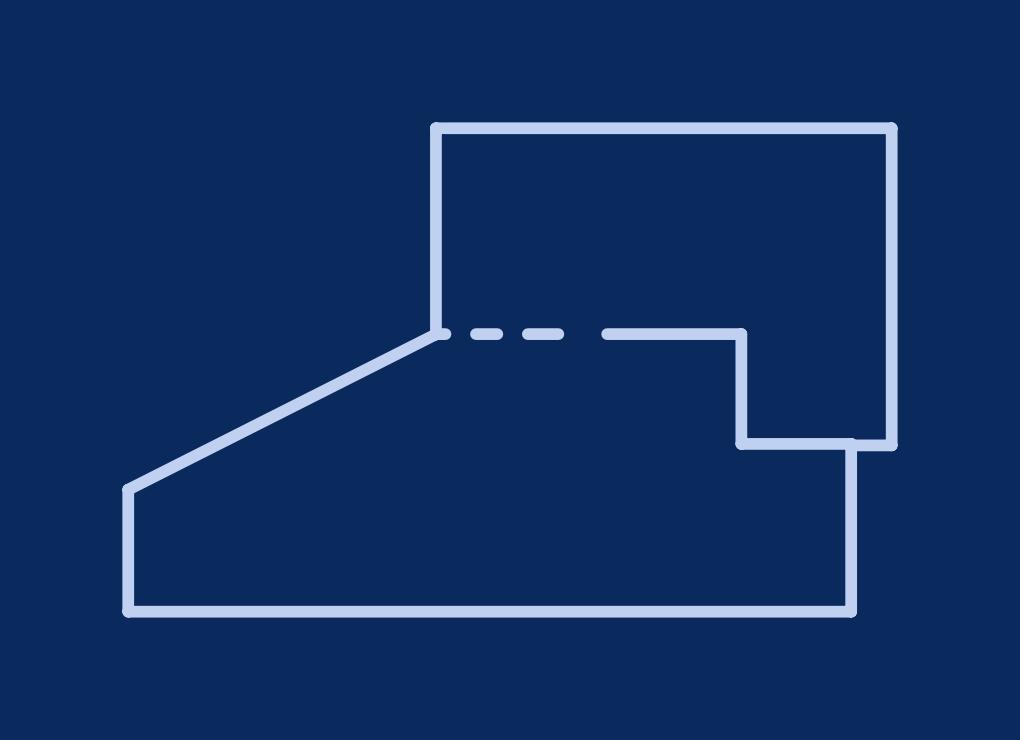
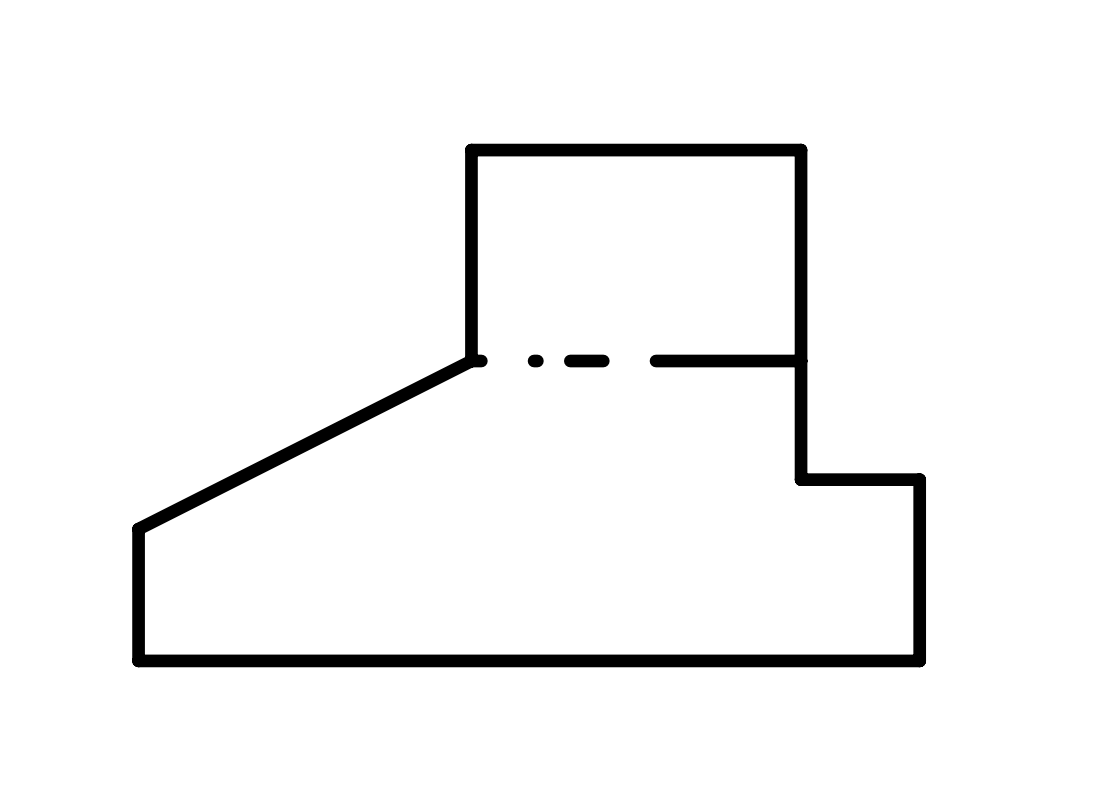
board edge: (442, 128) (435, 128) (435, 334) -> (801, 361) (801, 150) (471, 150) (471, 361)
board edge: (445, 128) (891, 128) (891, 445) (851, 445) -> none
board edge: (494, 334) (475, 334) -> none

